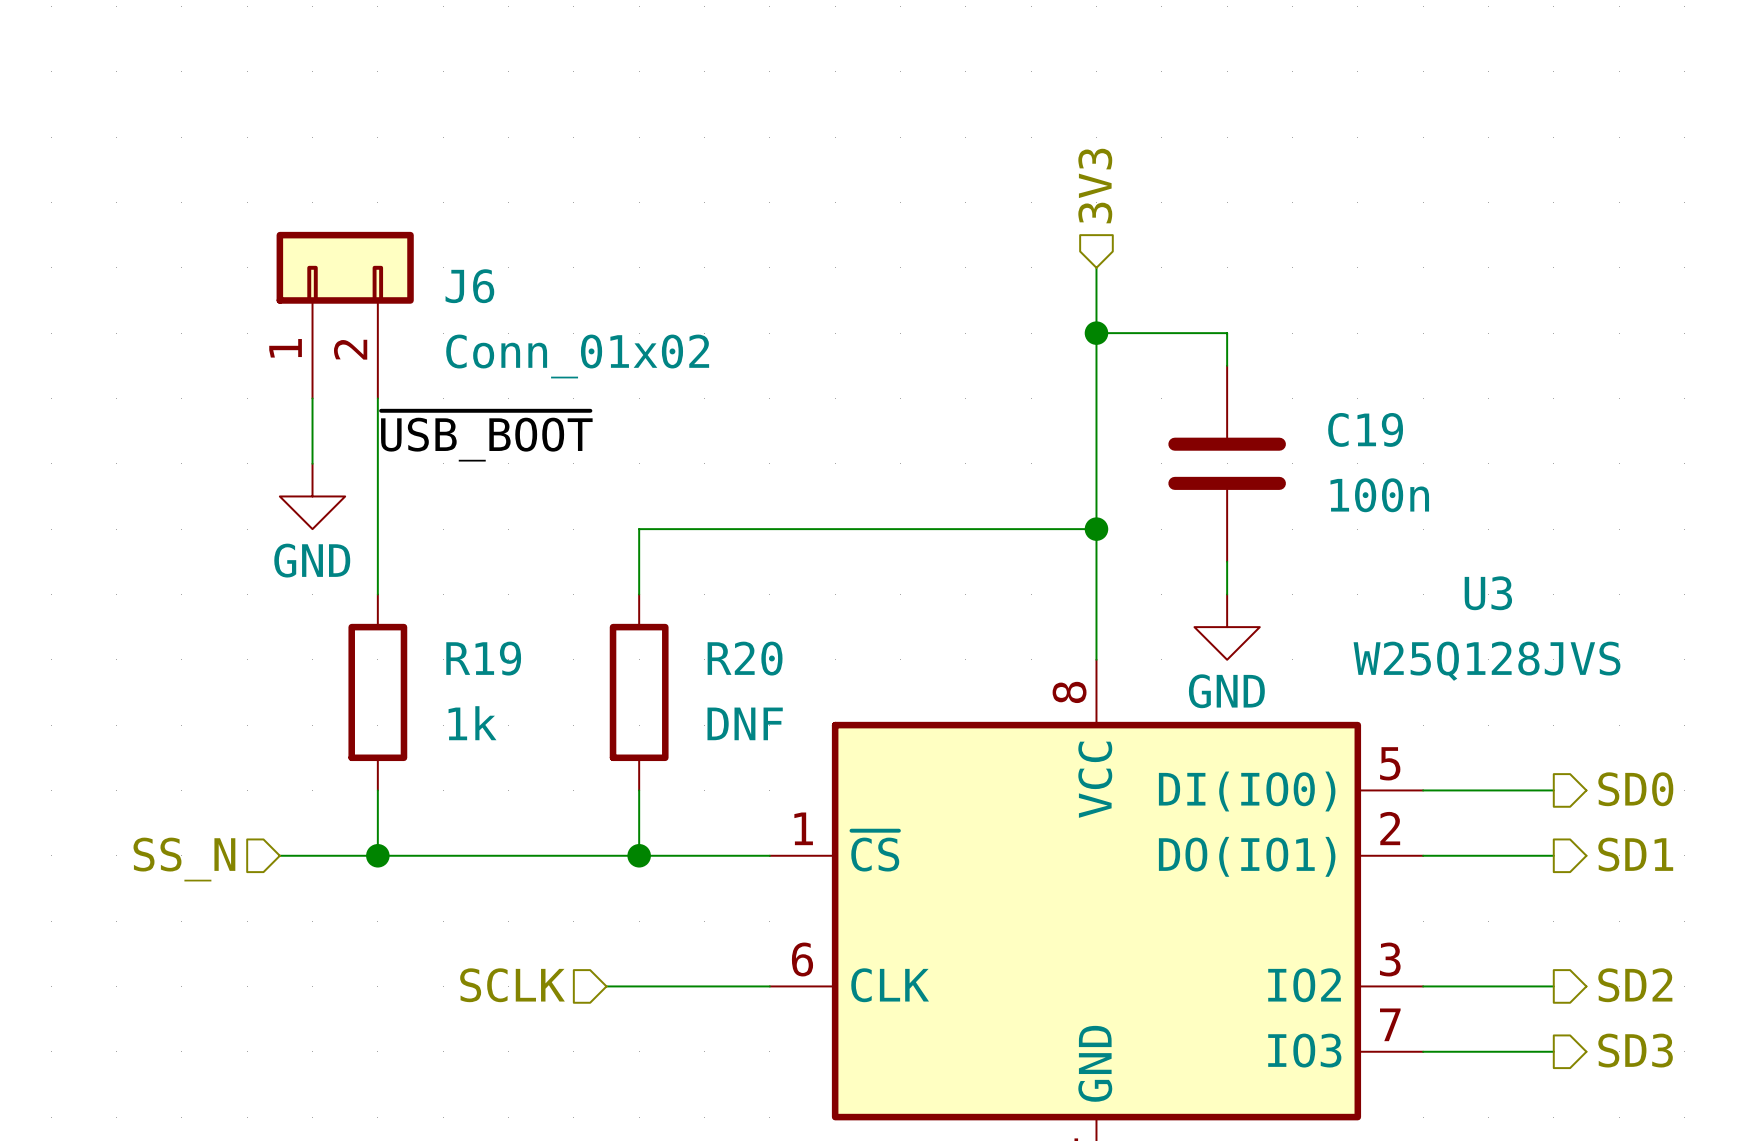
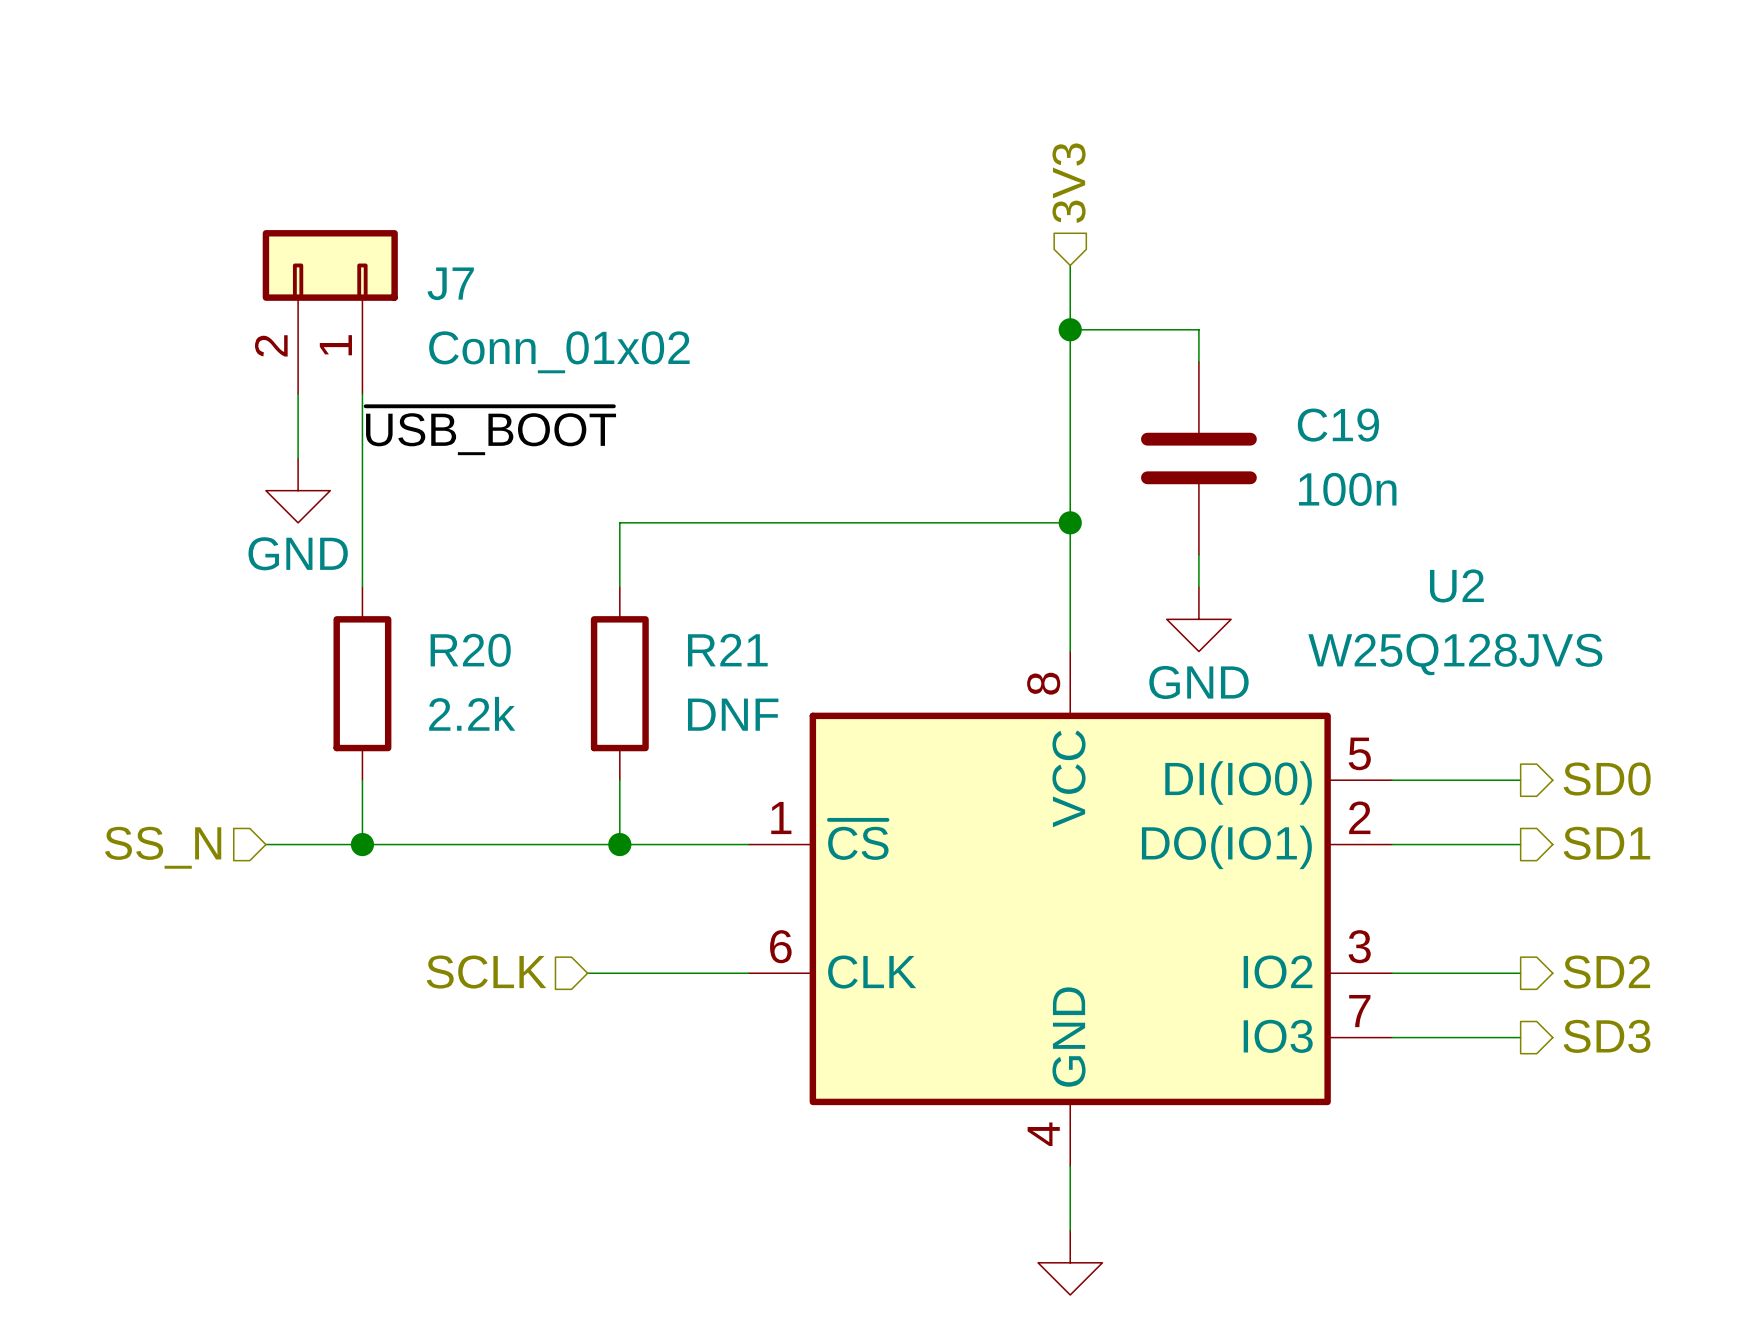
J6 flip: as is (345, 267) -> left-right (330, 265)
J6 name: J6 (469, 286) -> J7 (450, 283)
U3 name: U3 (1488, 593) -> U2 (1456, 585)
R19 name: R19 (483, 658) -> R20 (470, 650)
R20 name: R20 (745, 658) -> R21 (727, 650)
R19 value: 1k (472, 723) -> 2.2k (472, 713)

